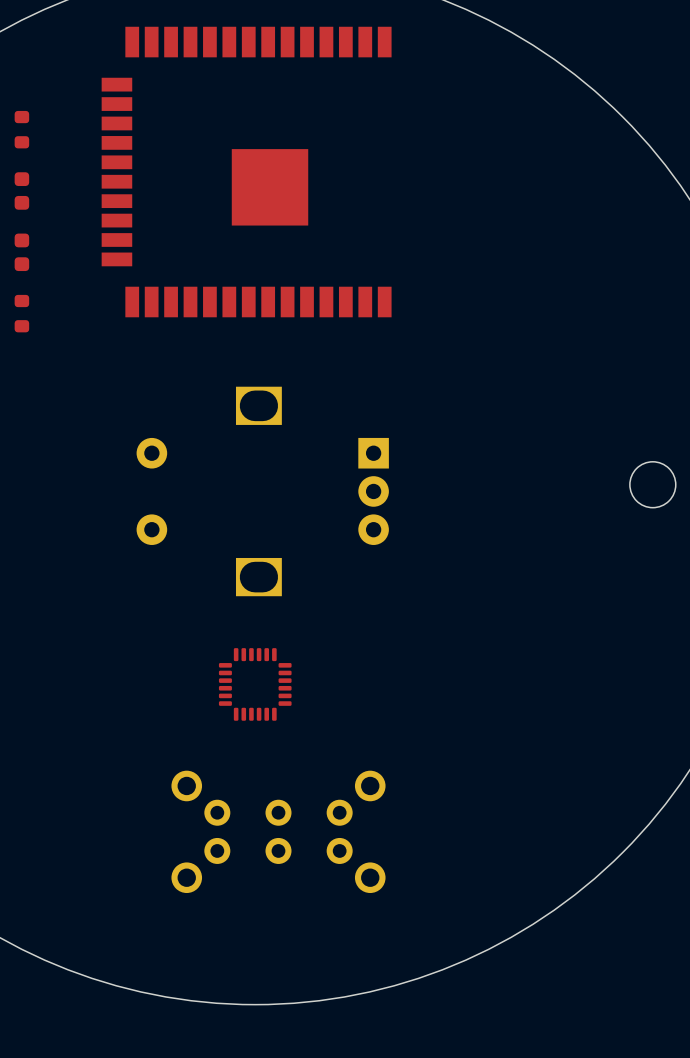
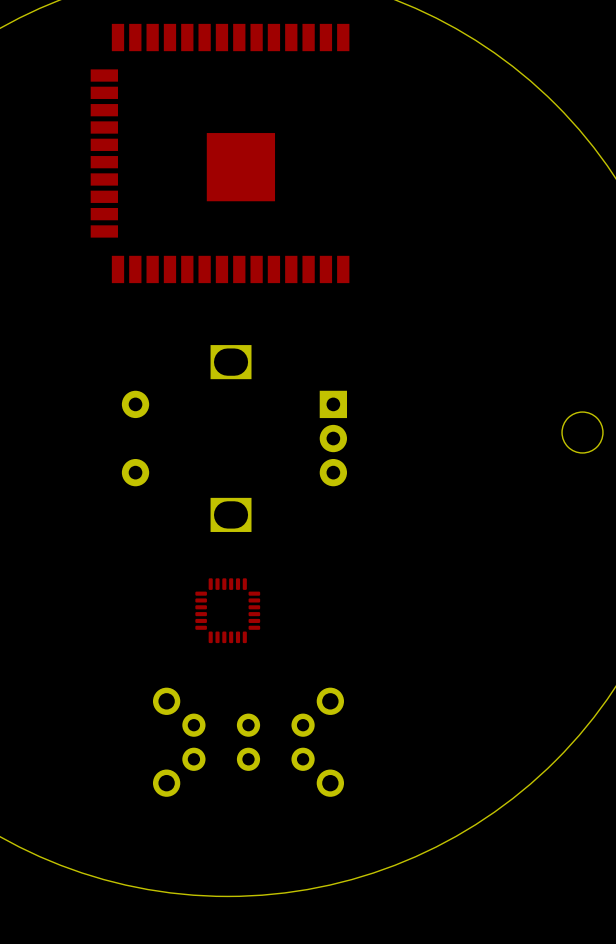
part: (21, 129) -> none
part: (21, 190) -> none
part: (21, 252) -> none
part: (21, 313) -> none

